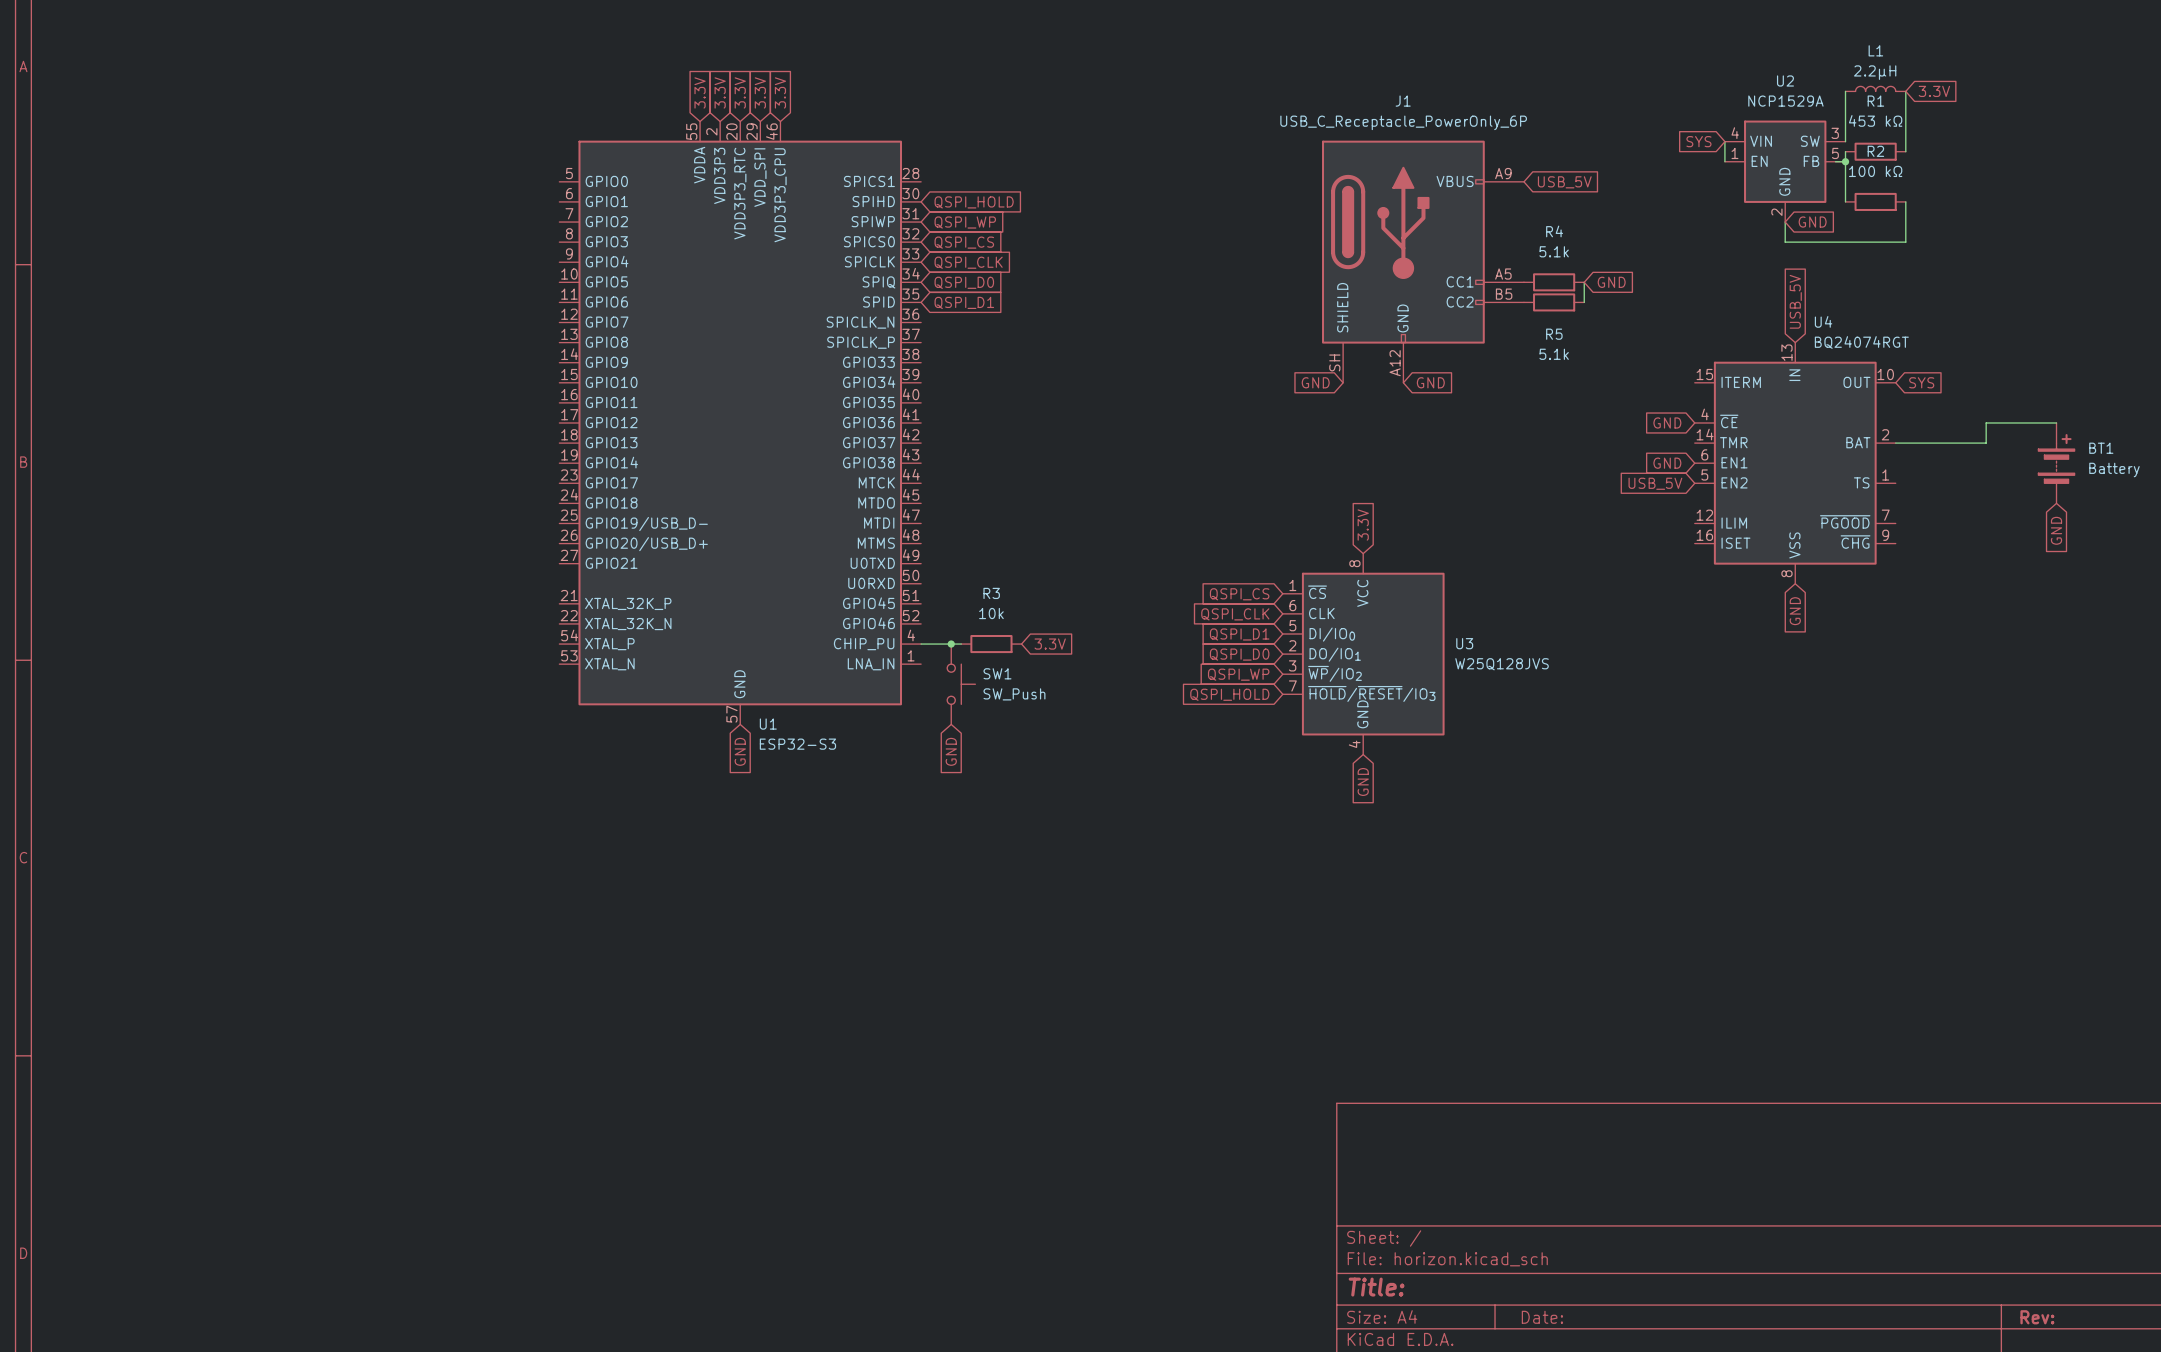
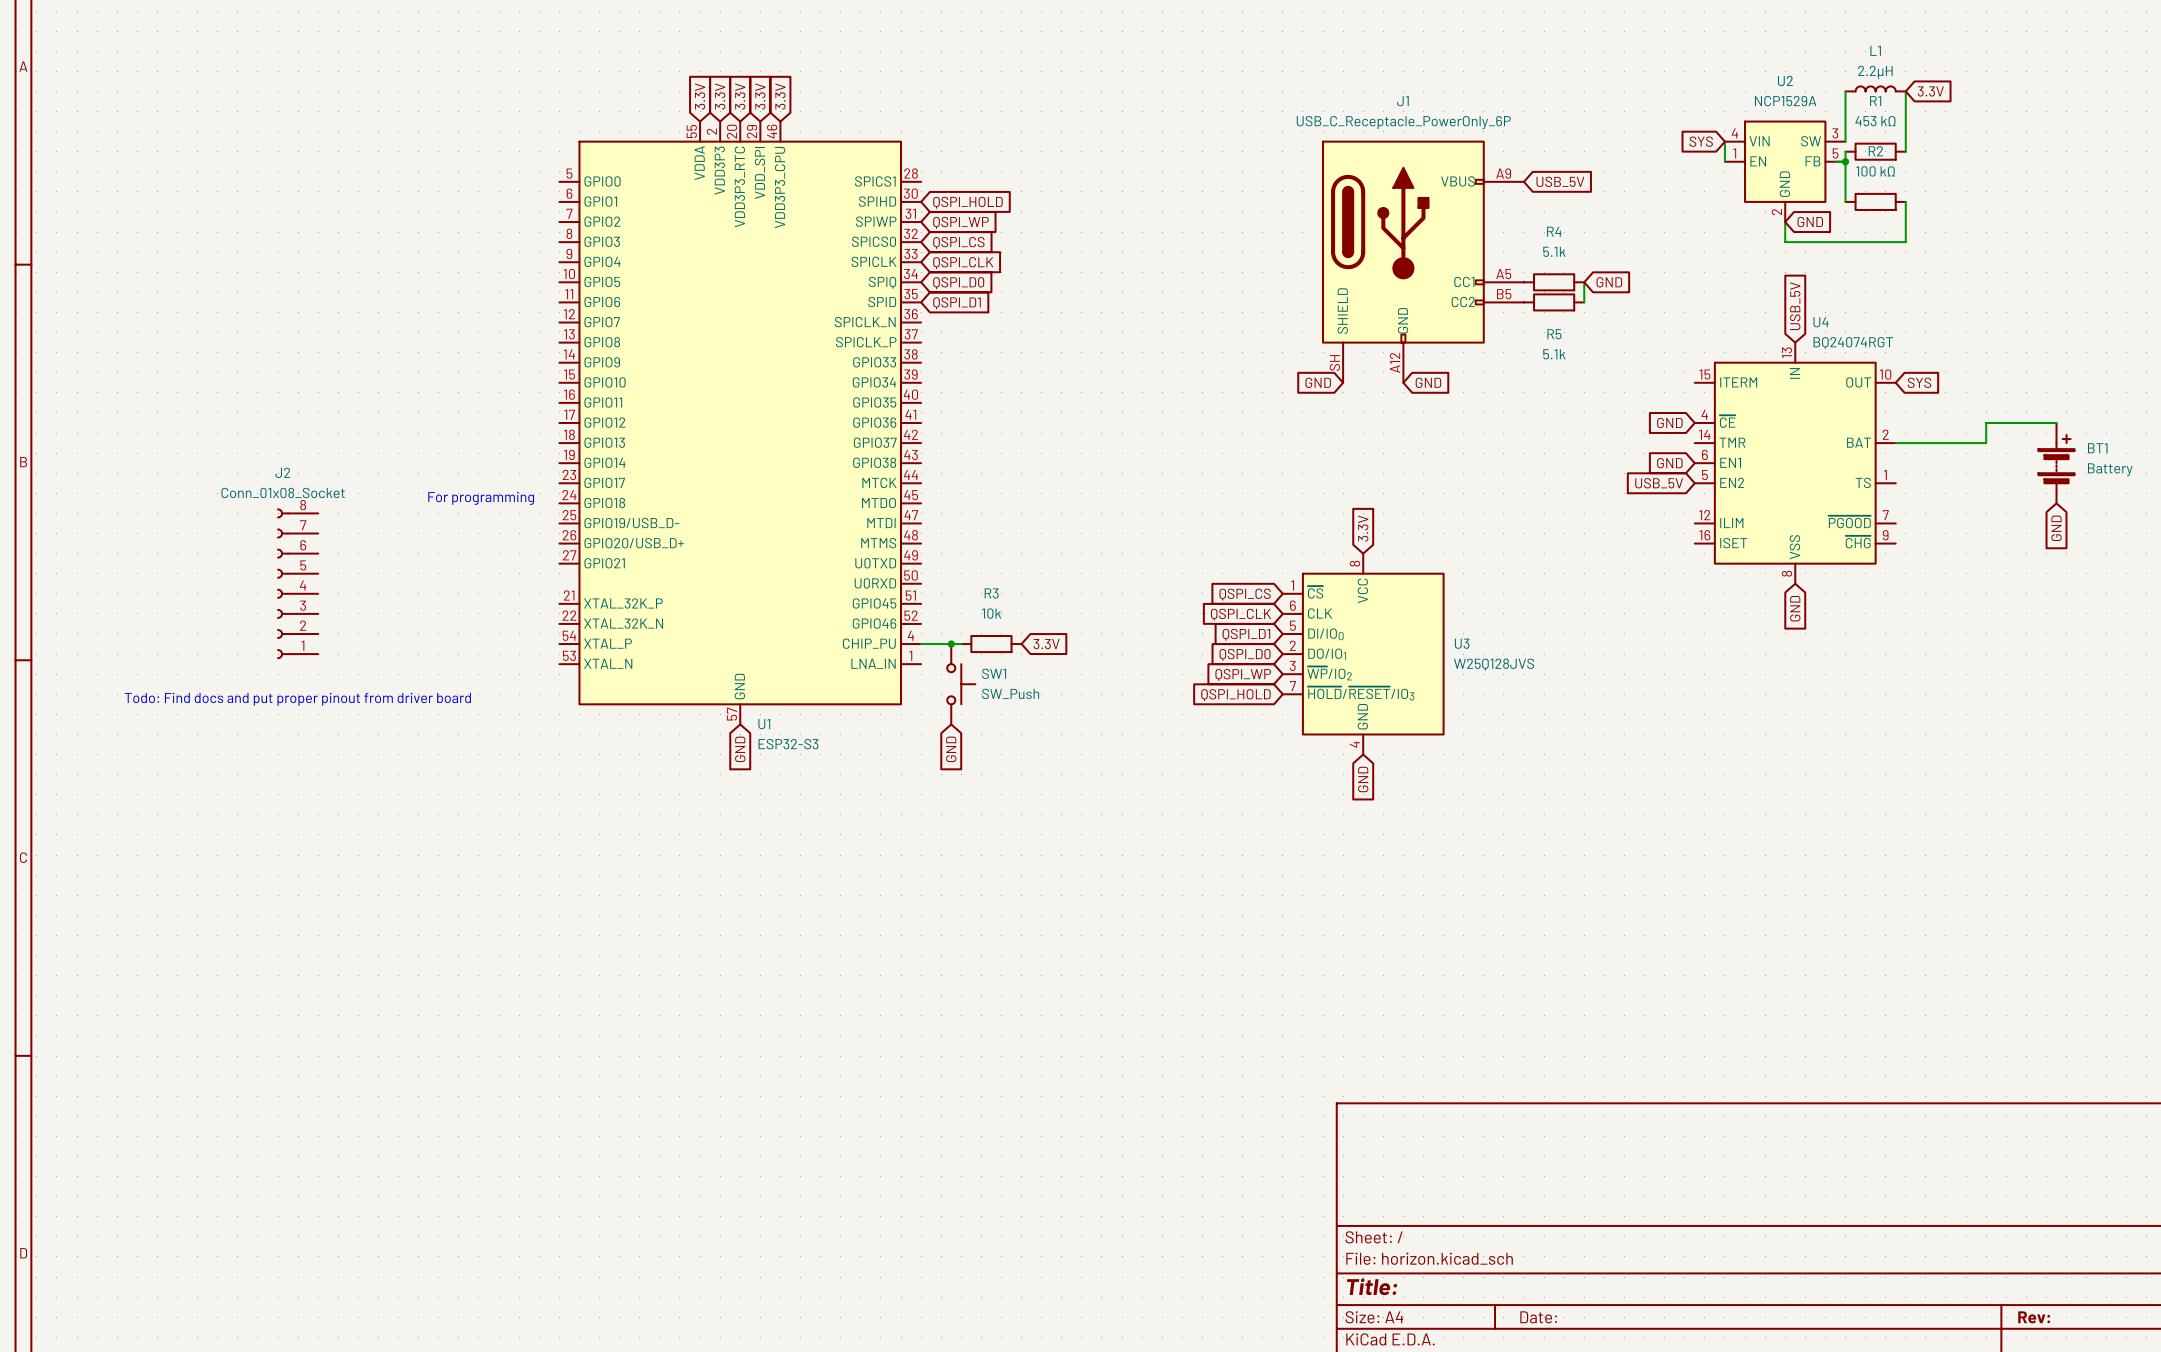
text: none -> For programming (481, 498)
J2: none -> Conn_01x08_Socket (297, 583)
text: none -> Todo: Find docs and put proper pinout from driver board (297, 699)

